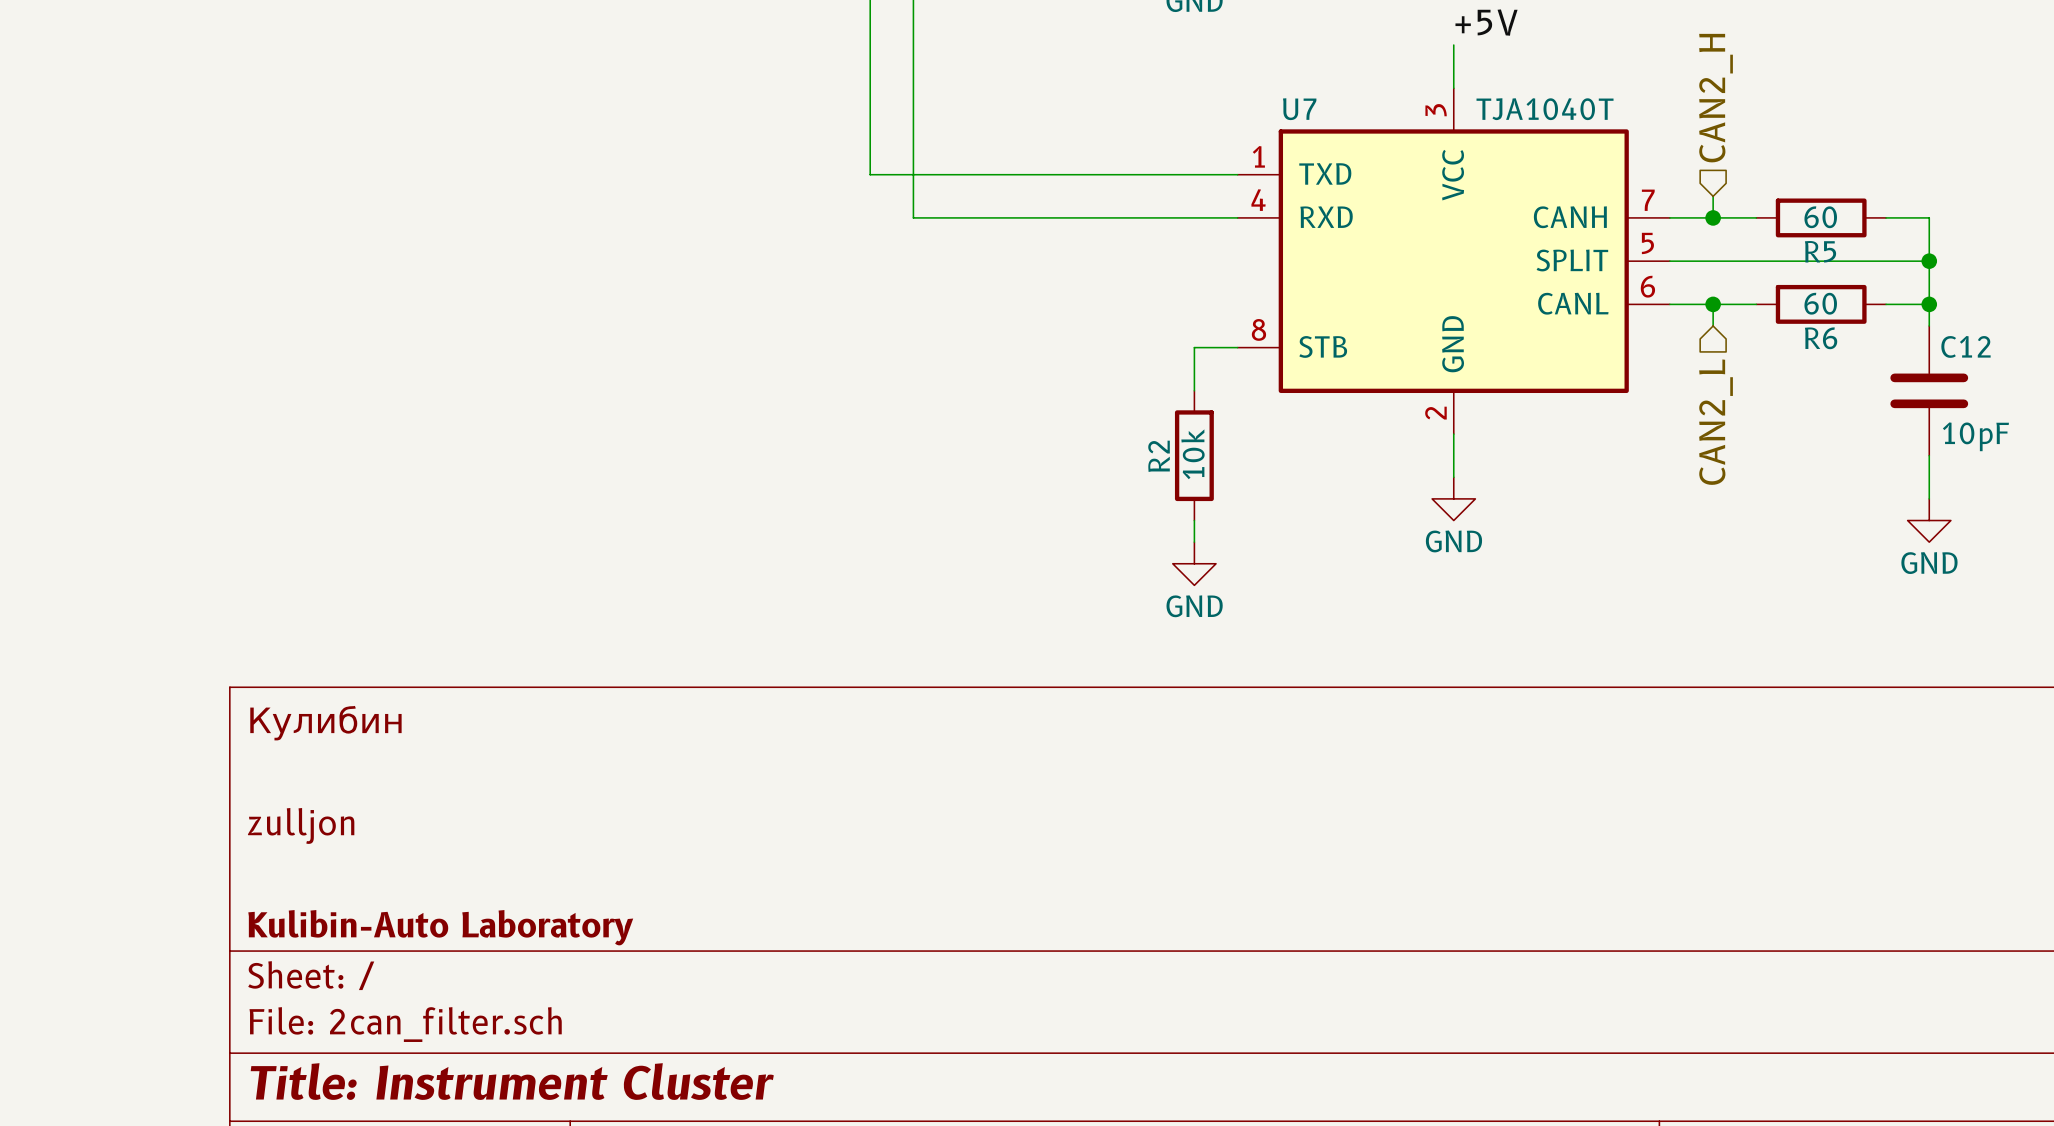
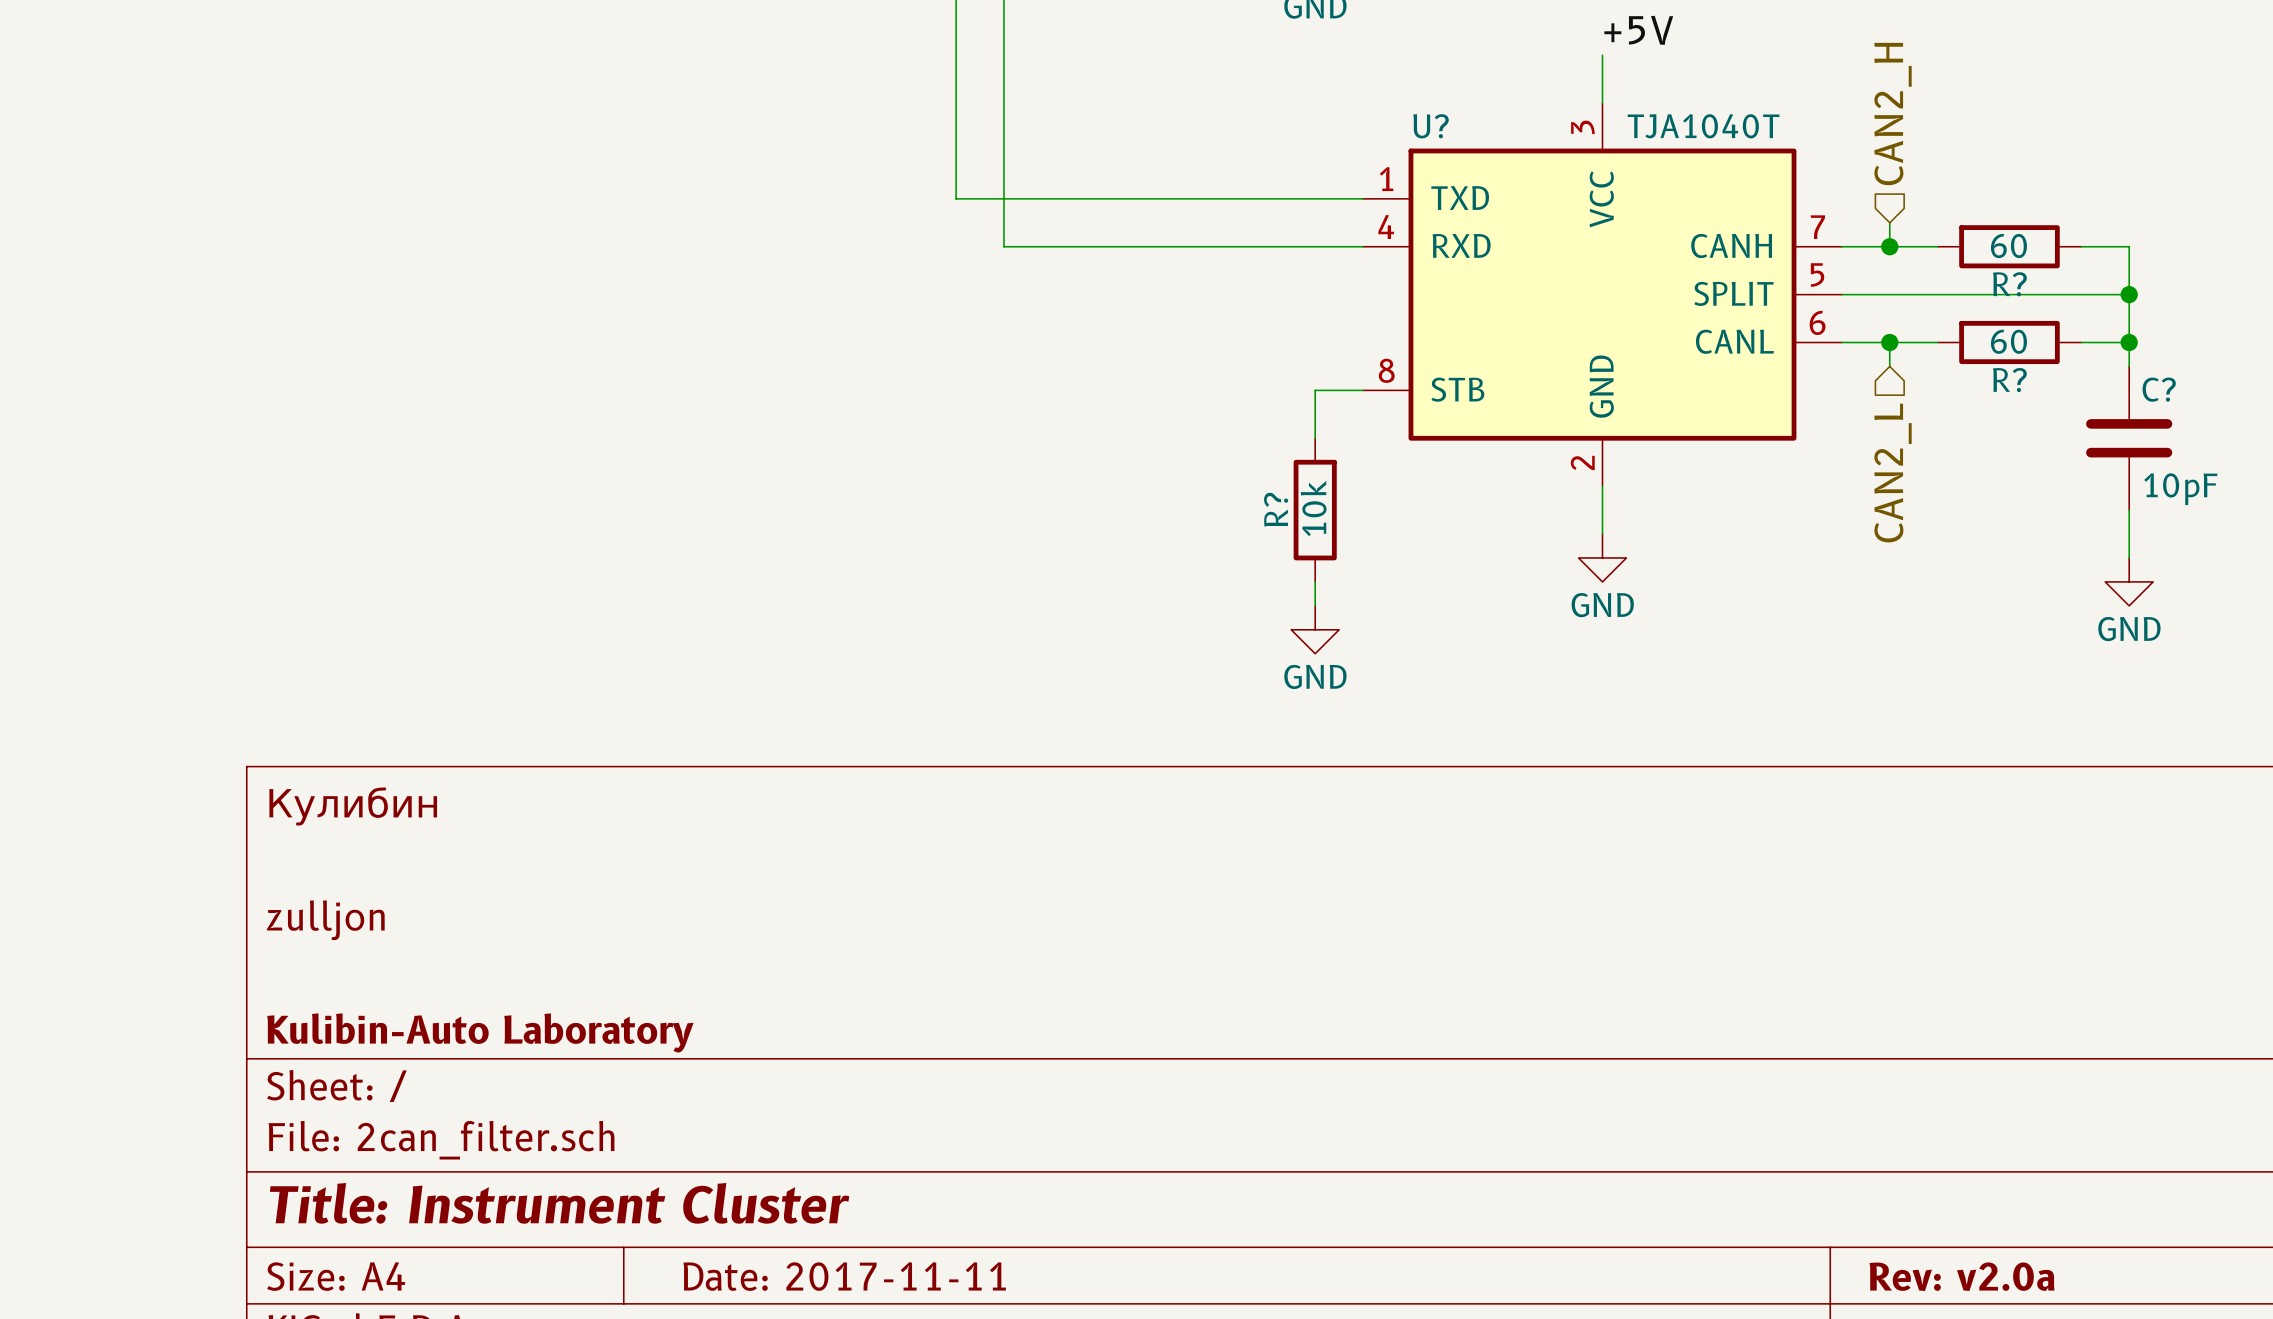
U7 name: U7 (1299, 109) -> U? (1431, 126)
R5 name: R5 (1820, 251) -> R? (2009, 284)
R6 name: R6 (1821, 338) -> R? (2009, 380)
C12 name: C12 (1965, 346) -> C? (2159, 389)
R2 name: R2 (1159, 456) -> R? (1276, 509)

